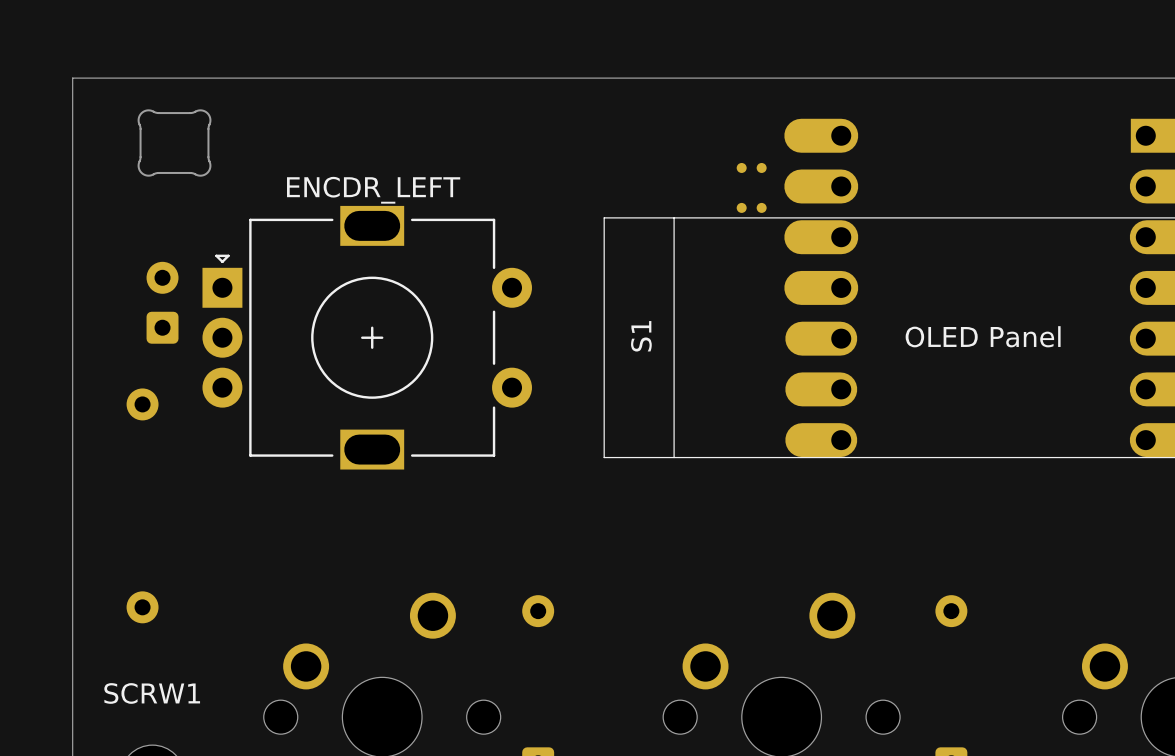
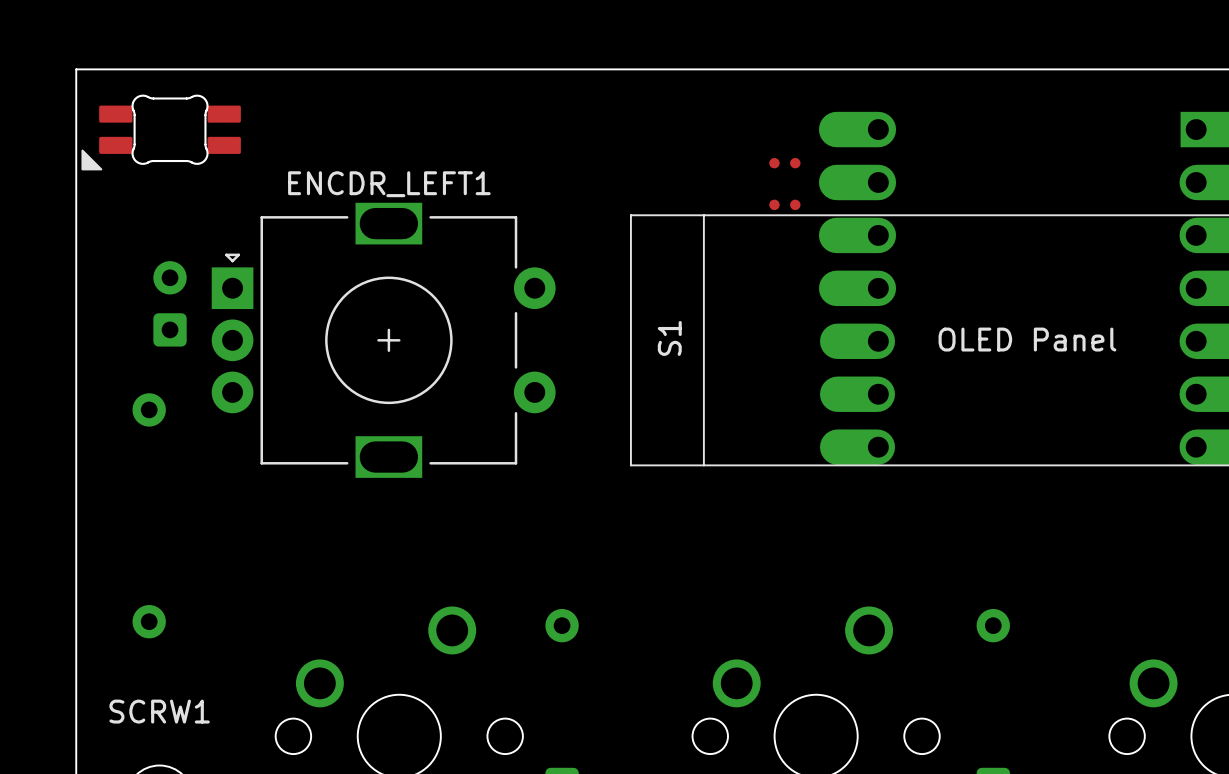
part: none -> (161, 132)
part: (174, 143) -> none
ENCDR_LEFT name: ENCDR_LEFT (373, 190) -> ENCDR_LEFT1 (389, 184)

